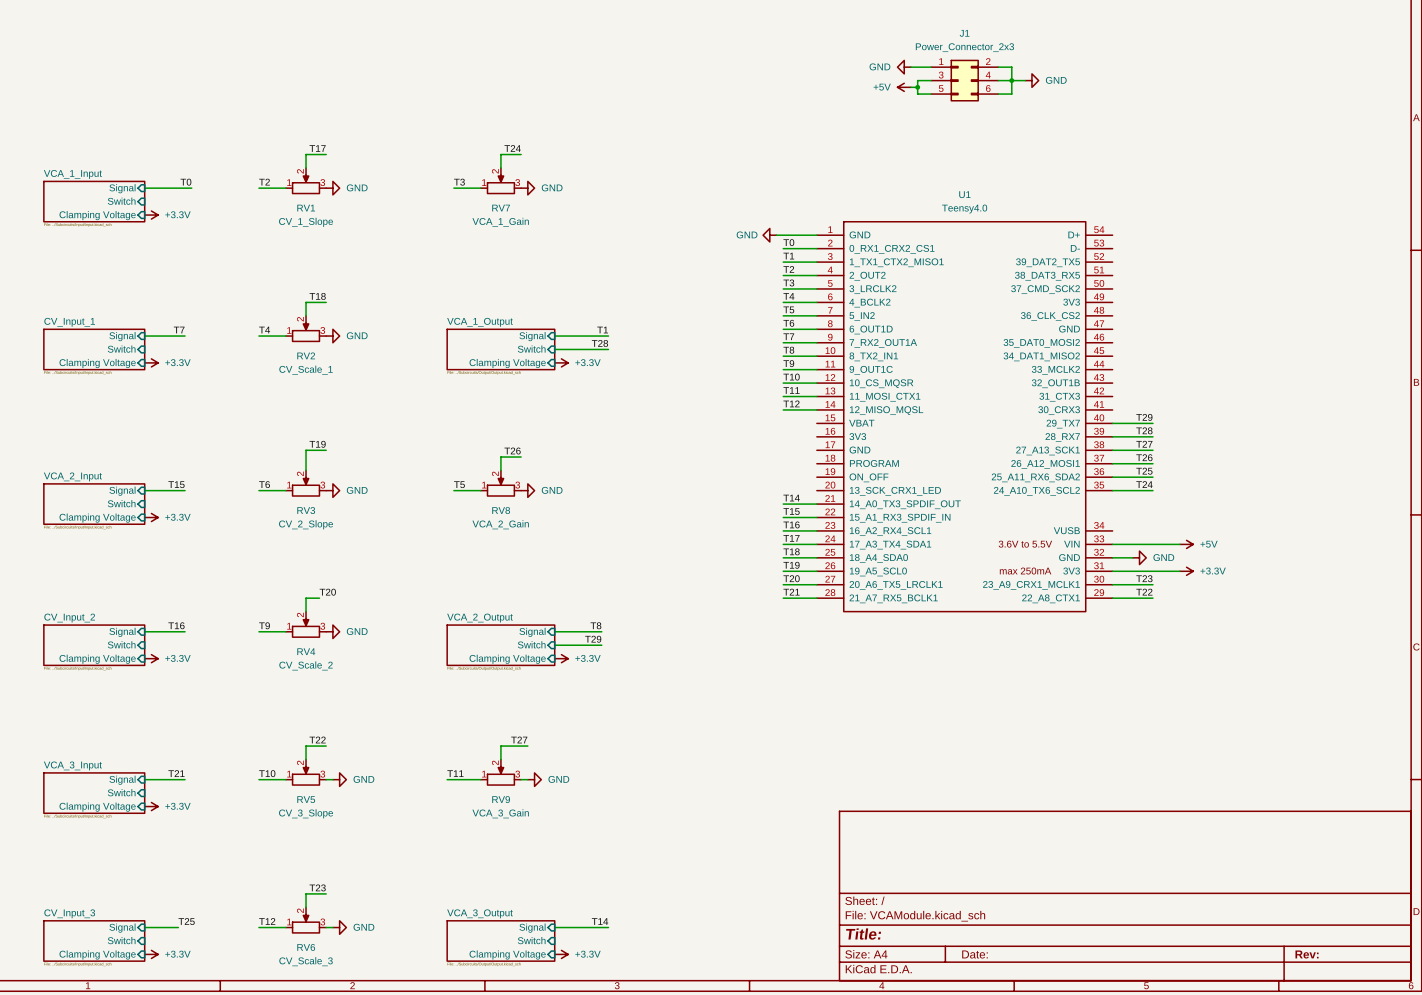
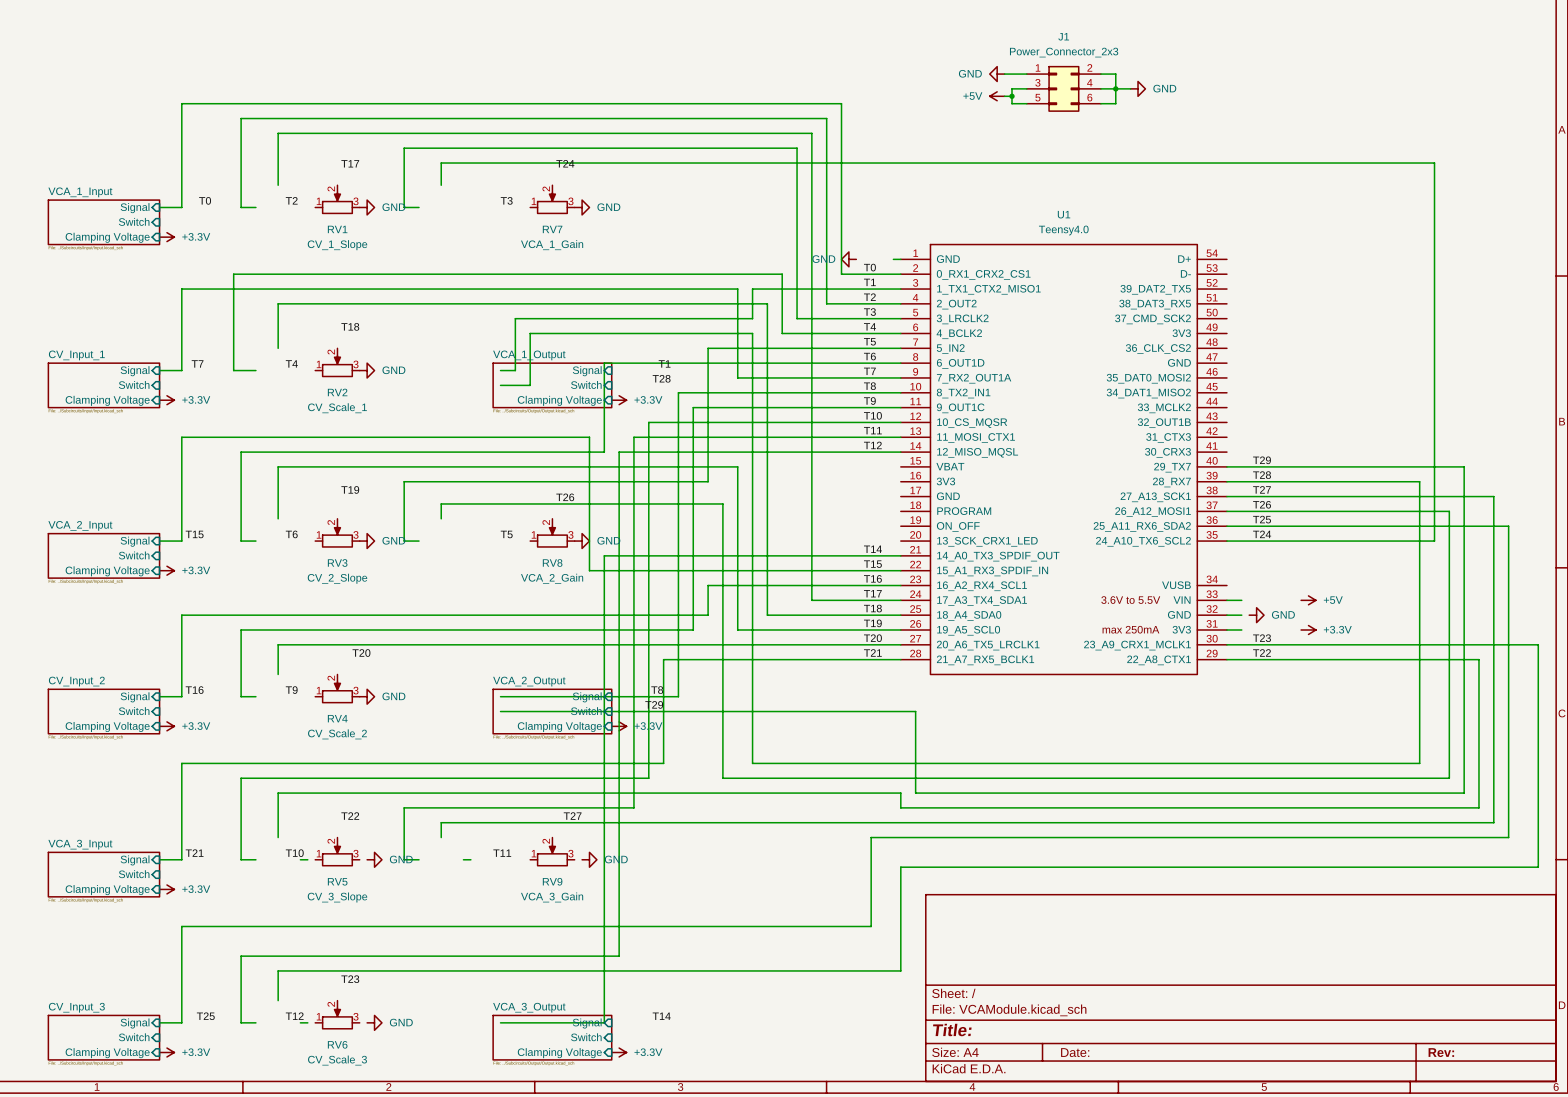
wire: (326, 154) (306, 154) (306, 167) -> none
wire: (521, 154) (500, 154) (500, 167) -> none
wire: none -> (278, 185) (278, 133) (811, 133) (811, 600) (863, 600)
wire: none -> (441, 185) (441, 163) (1434, 163) (1434, 541) (1271, 541)
wire: (164, 188) (191, 188) -> (181, 207) (181, 103) (841, 103) (841, 274) (863, 274)
wire: none -> (255, 207) (241, 207) (241, 118) (826, 118) (826, 303) (863, 303)
wire: (258, 188) (285, 188) -> none
wire: none -> (419, 207) (404, 207) (404, 148) (797, 148) (797, 318) (863, 318)
wire: (453, 188) (480, 188) -> none
wire: (776, 235) (810, 235) -> none
wire: none -> (863, 289) (752, 289) (752, 318) (515, 318) (515, 370) (500, 370)
wire: (326, 302) (306, 302) (306, 315) -> none
wire: none -> (863, 333) (782, 333) (782, 274) (233, 274) (233, 370) (255, 370)
wire: none -> (278, 348) (278, 303) (767, 303) (767, 615) (863, 615)
wire: none -> (863, 348) (708, 348) (708, 481) (404, 481) (404, 541) (419, 541)
wire: none -> (863, 363) (604, 363) (604, 452) (241, 452) (241, 541) (255, 541)
wire: (164, 336) (185, 336) -> (181, 370) (181, 289) (737, 289) (737, 377) (863, 377)
wire: (258, 336) (285, 336) -> none
wire: (554, 336) (608, 336) -> none
wire: none -> (500, 385) (530, 385) (530, 333) (752, 333) (752, 763) (1419, 763) (1419, 481) (1271, 481)
wire: (554, 349) (608, 349) -> none
wire: none -> (863, 392) (678, 392) (678, 696) (663, 696)
wire: none -> (863, 407) (693, 407) (693, 629) (241, 629) (241, 696) (255, 696)
wire: none -> (863, 422) (648, 422) (648, 778) (241, 778) (241, 859) (255, 859)
wire: none -> (863, 437) (633, 437) (633, 807) (404, 807) (404, 859) (419, 859)
wire: none -> (863, 452) (619, 452) (619, 956) (241, 956) (241, 1022) (255, 1022)
wire: none -> (1271, 466) (1464, 466) (1464, 793) (915, 793) (915, 711) (663, 711)
wire: (326, 450) (306, 450) (306, 470) -> none
wire: none -> (1271, 496) (1493, 496) (1493, 822) (582, 822)
wire: (500, 457) (500, 470) -> (552, 503) (441, 503) (441, 518)
wire: none -> (574, 503) (722, 503) (722, 778) (1449, 778) (1449, 511) (1271, 511)
wire: none -> (278, 518) (278, 466) (737, 466) (737, 629) (863, 629)
wire: (164, 490) (185, 490) -> (181, 541) (181, 437) (589, 437) (589, 570) (863, 570)
wire: (258, 490) (285, 490) -> none
wire: (453, 490) (480, 490) -> none
wire: none -> (863, 555) (604, 555) (604, 1022) (500, 1022)
wire: (1126, 544) (1179, 544) -> none
wire: (1126, 557) (1132, 557) -> none
wire: (1126, 571) (1179, 571) -> none
wire: none -> (863, 644) (278, 644) (278, 674)
wire: none -> (1271, 644) (1538, 644) (1538, 867) (900, 867) (900, 970) (278, 970) (278, 1000)
wire: (319, 598) (306, 598) (306, 611) -> none
wire: none -> (1271, 659) (1478, 659) (1478, 807) (900, 807) (900, 793) (278, 793) (278, 837)
wire: (164, 631) (185, 631) -> (181, 696) (181, 615) (708, 615) (708, 585) (863, 585)
wire: (258, 631) (285, 631) -> none
wire: none -> (500, 696) (611, 696)
wire: none -> (500, 711) (611, 711)
wire: (326, 746) (306, 746) (306, 759) -> none
wire: (500, 746) (500, 759) -> (552, 822) (441, 822) (441, 837)
wire: (164, 779) (185, 779) -> (181, 859) (181, 763) (663, 763) (663, 659) (863, 659)
wire: (258, 779) (272, 779) -> none
wire: (279, 779) (285, 779) -> none
wire: (326, 779) (332, 779) -> (463, 859) (470, 859)
wire: (447, 779) (480, 779) -> none
wire: (521, 779) (527, 779) -> none
wire: (326, 893) (306, 893) (306, 907) -> none
wire: (164, 927) (178, 927) -> (181, 1022) (181, 926) (871, 926) (871, 837) (1508, 837) (1508, 526) (1271, 526)
wire: (258, 927) (272, 927) -> none
wire: (279, 927) (285, 927) -> none
wire: (326, 927) (332, 927) -> none
wire: (554, 927) (608, 927) -> none

